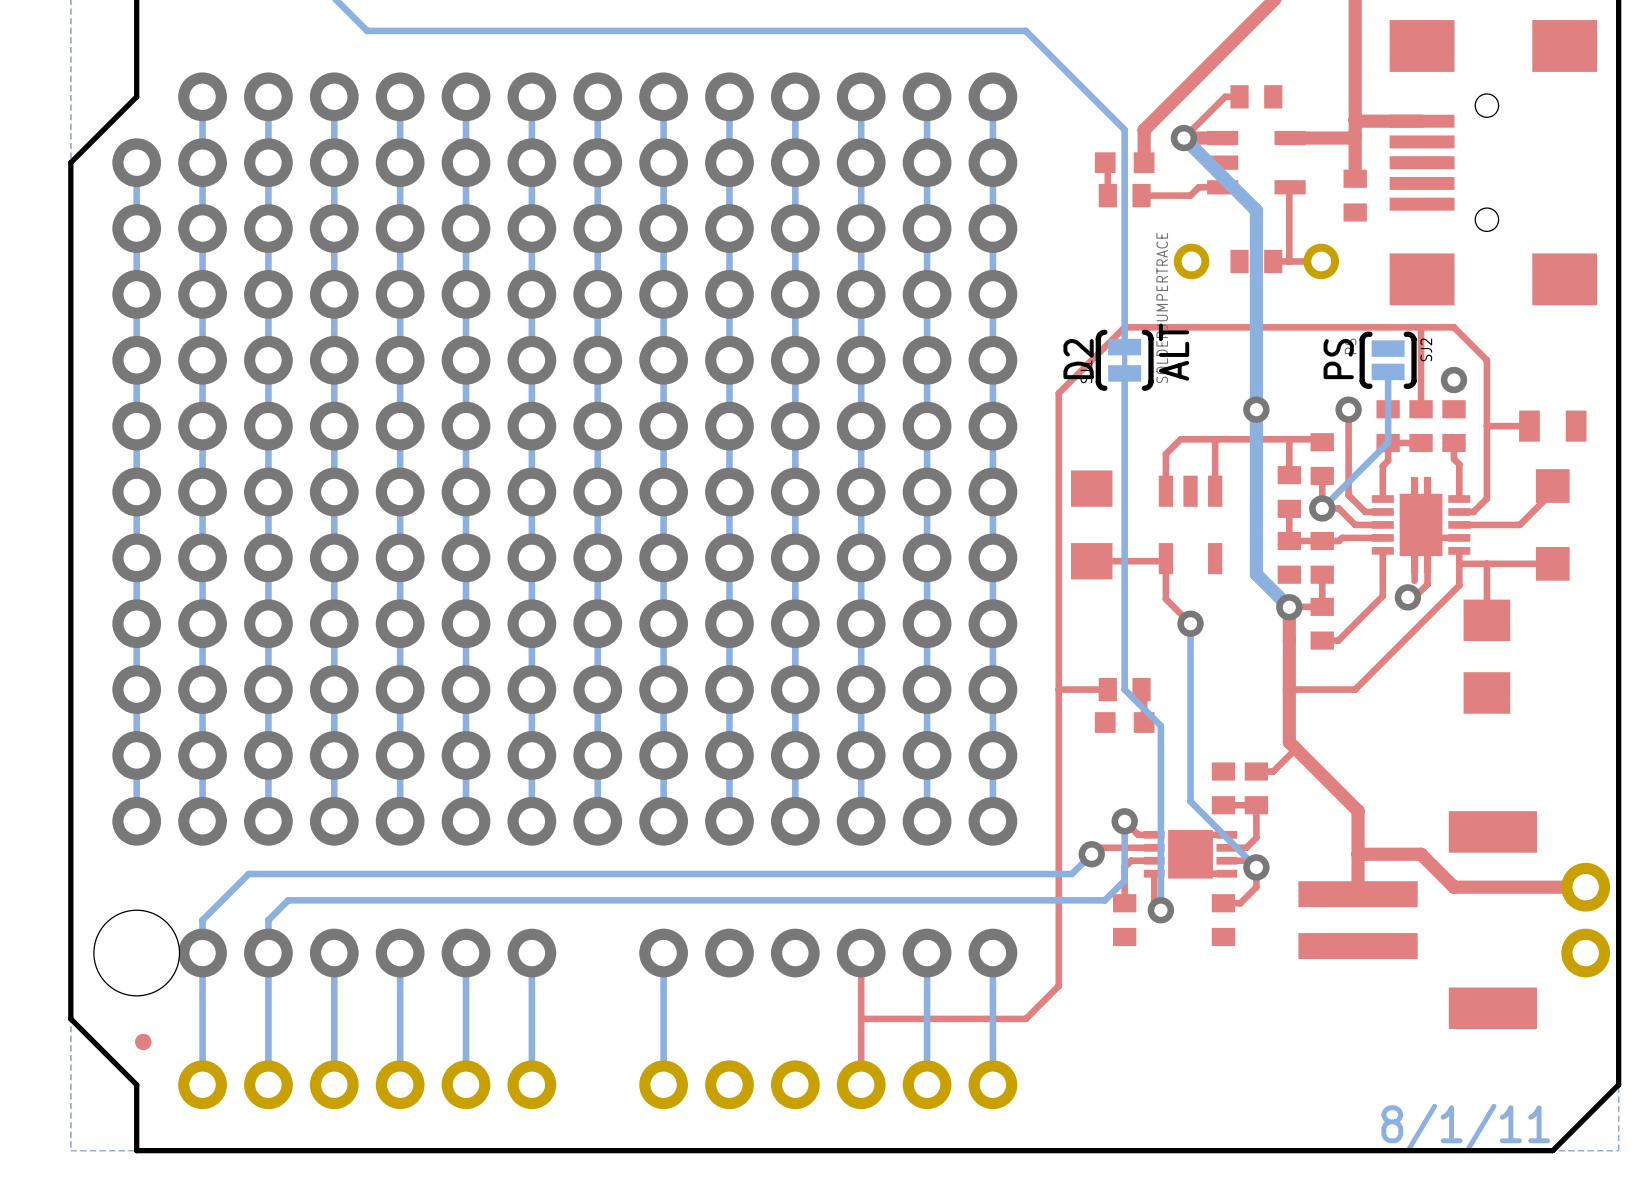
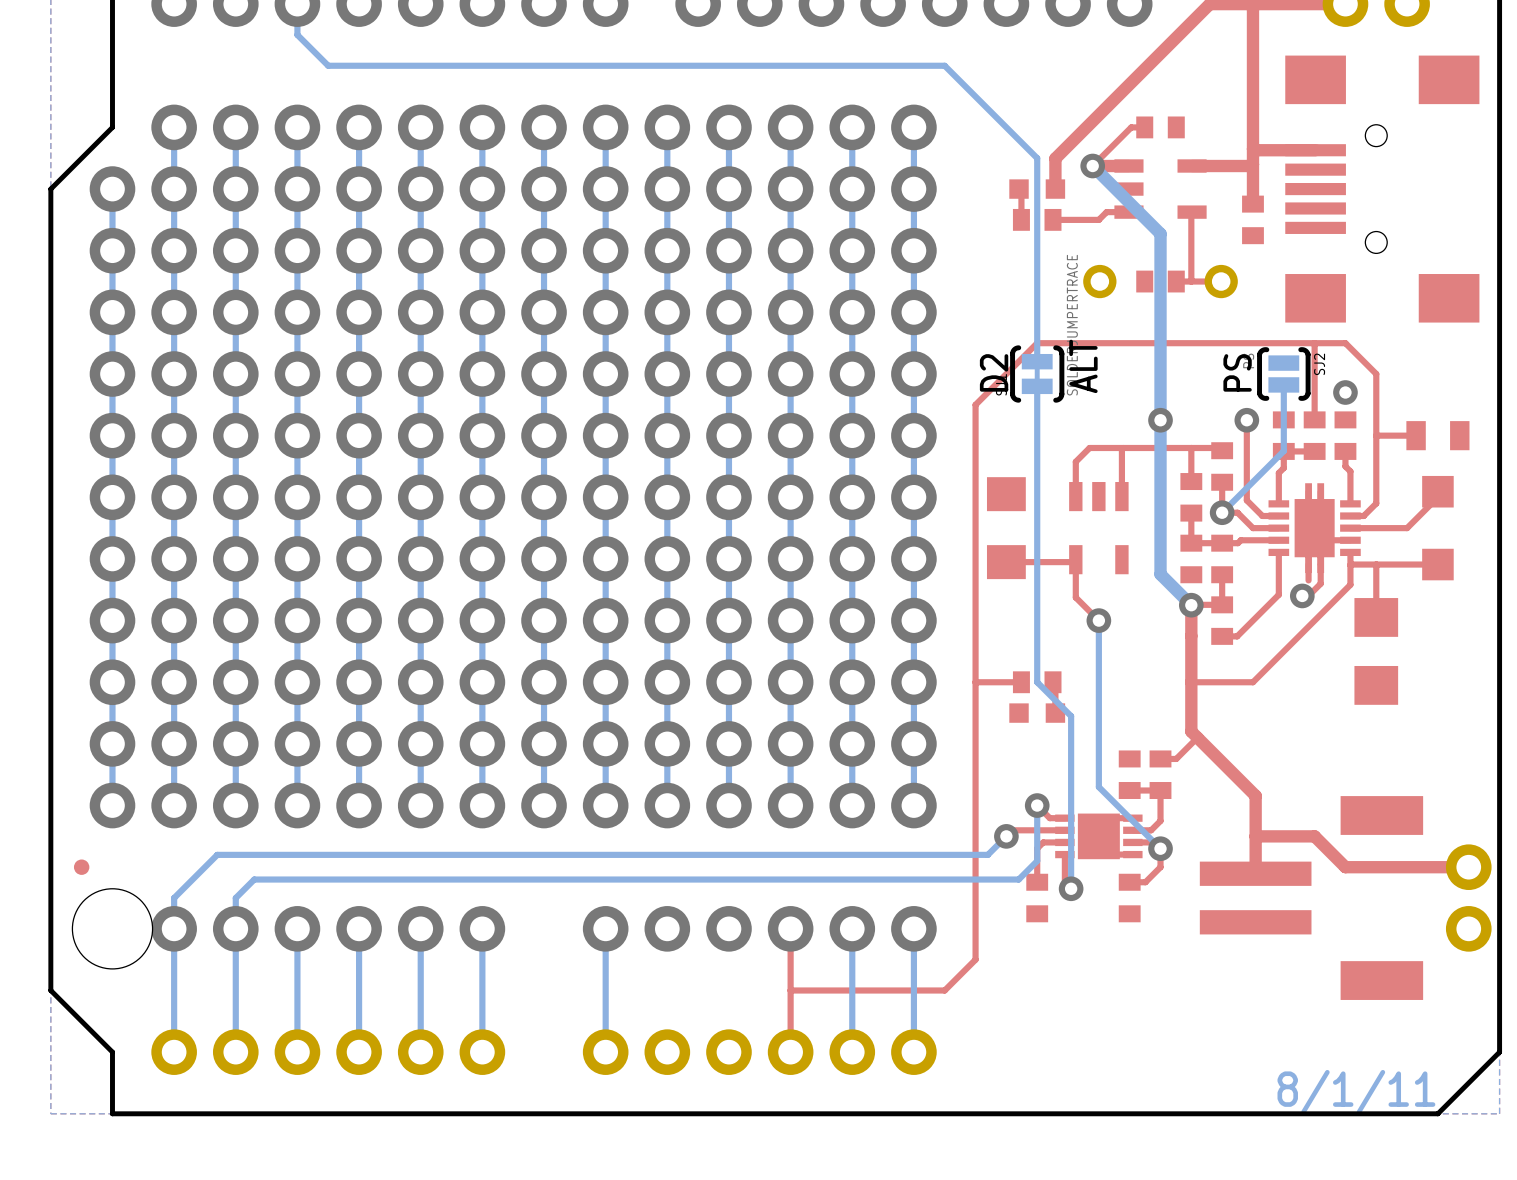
part position: (143, 1041) -> (81, 867)

